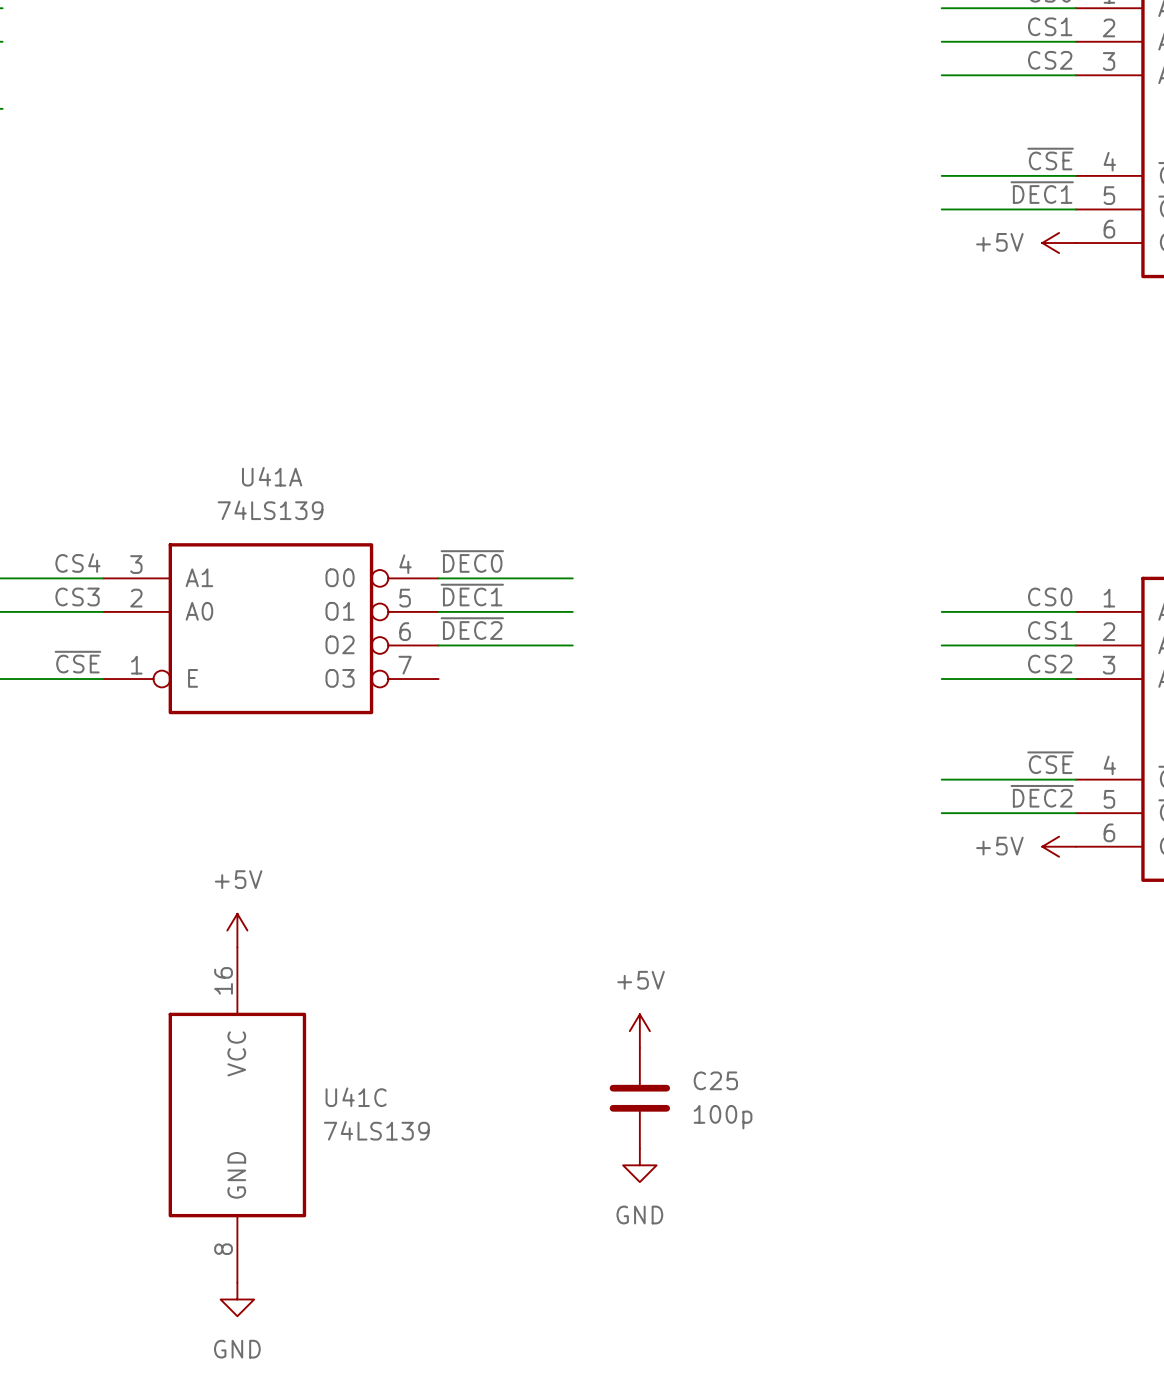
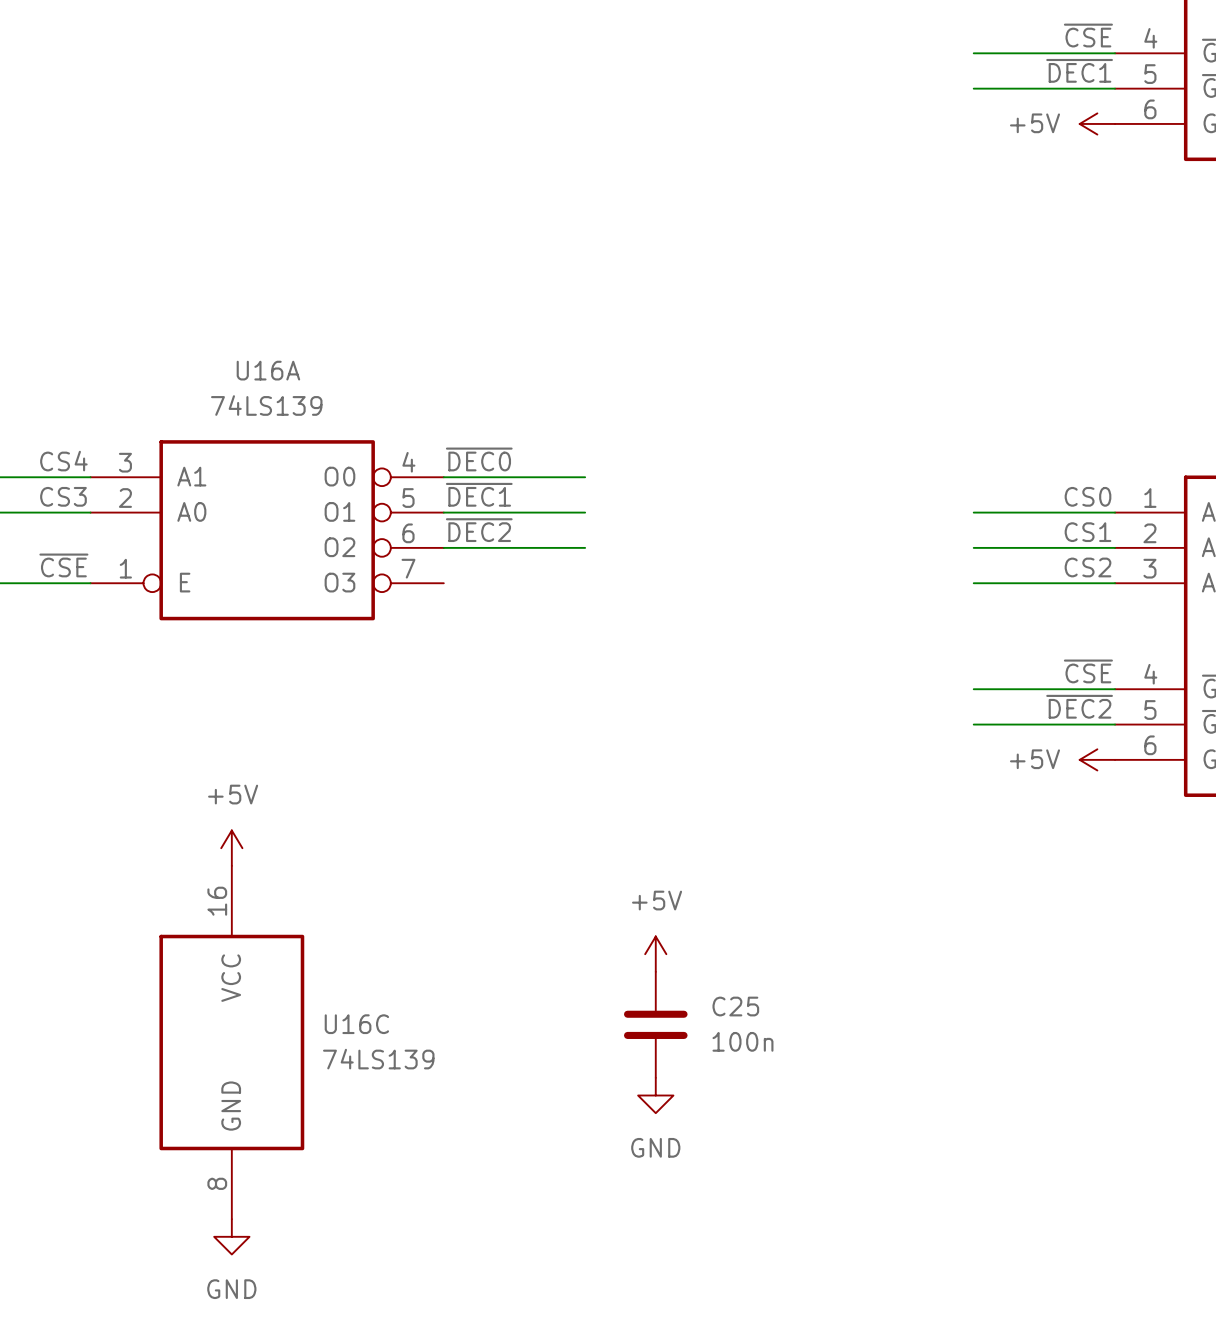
U41A name: U41A (272, 476) -> U16A (268, 370)
U41C name: U41C (356, 1097) -> U16C (356, 1024)
C25 value: 100p (723, 1117) -> 100n (742, 1041)

